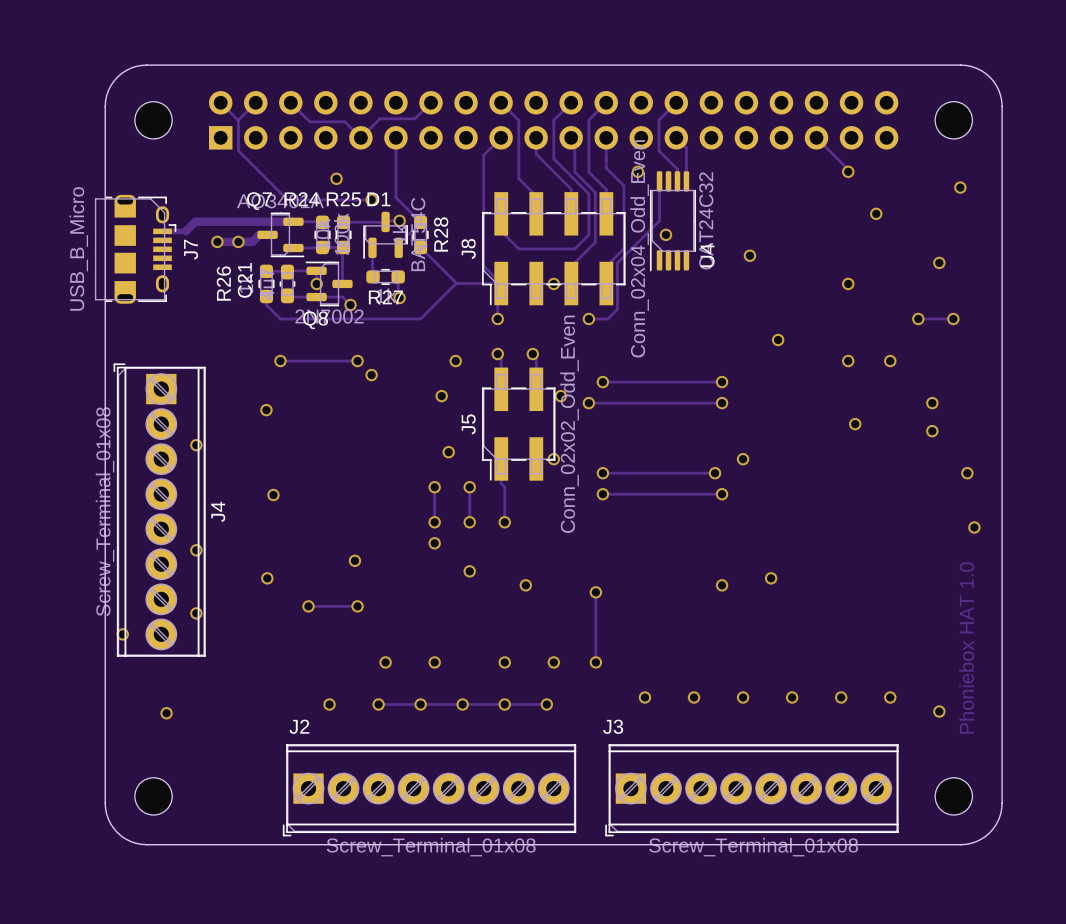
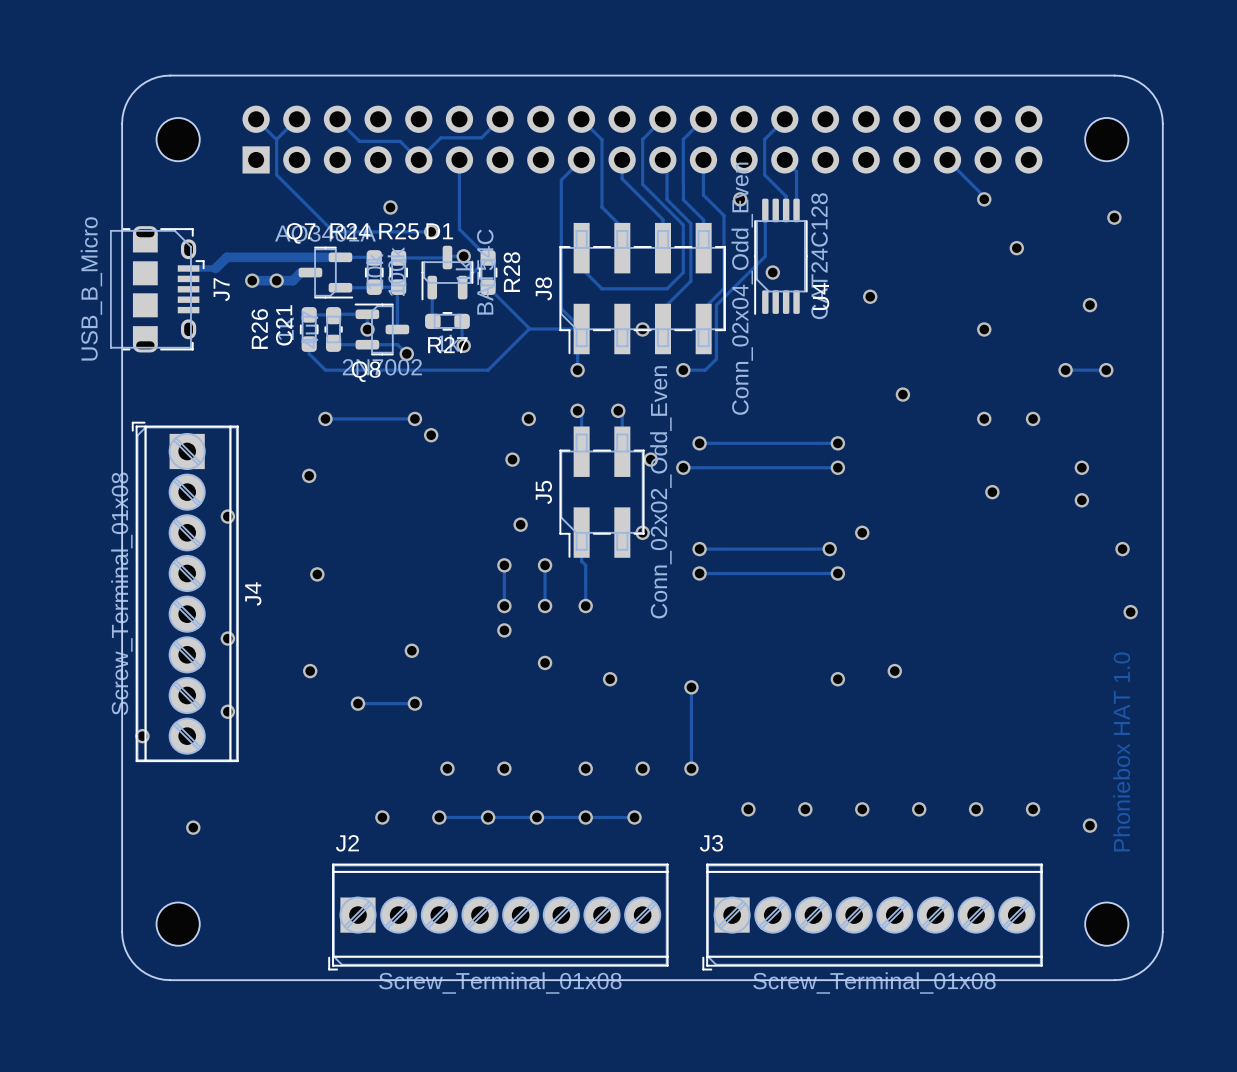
U4 value: CAT24C32 (706, 220) -> CAT24C128 (819, 256)

